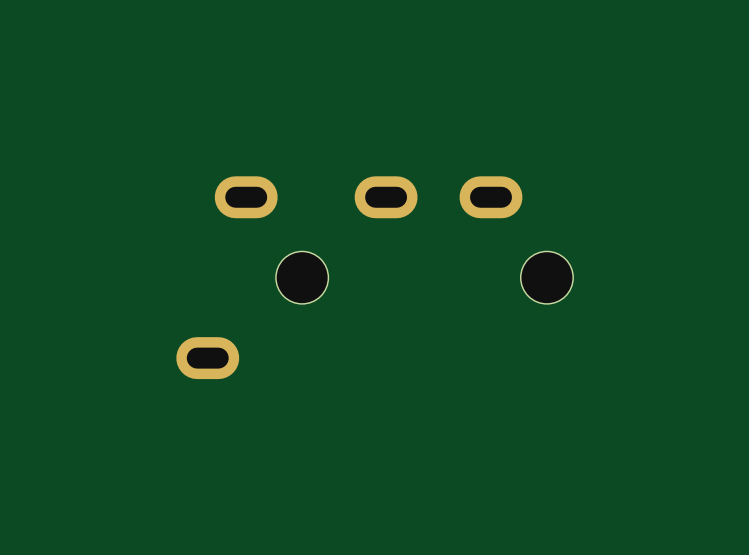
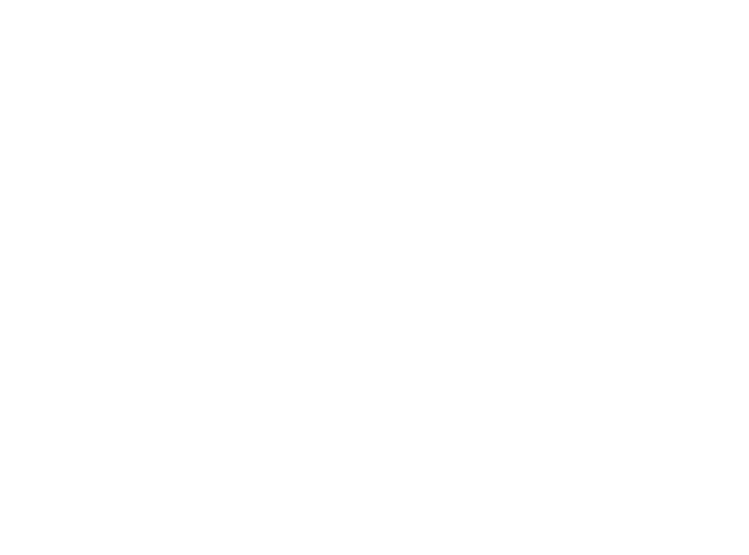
part: (374, 277) -> none

